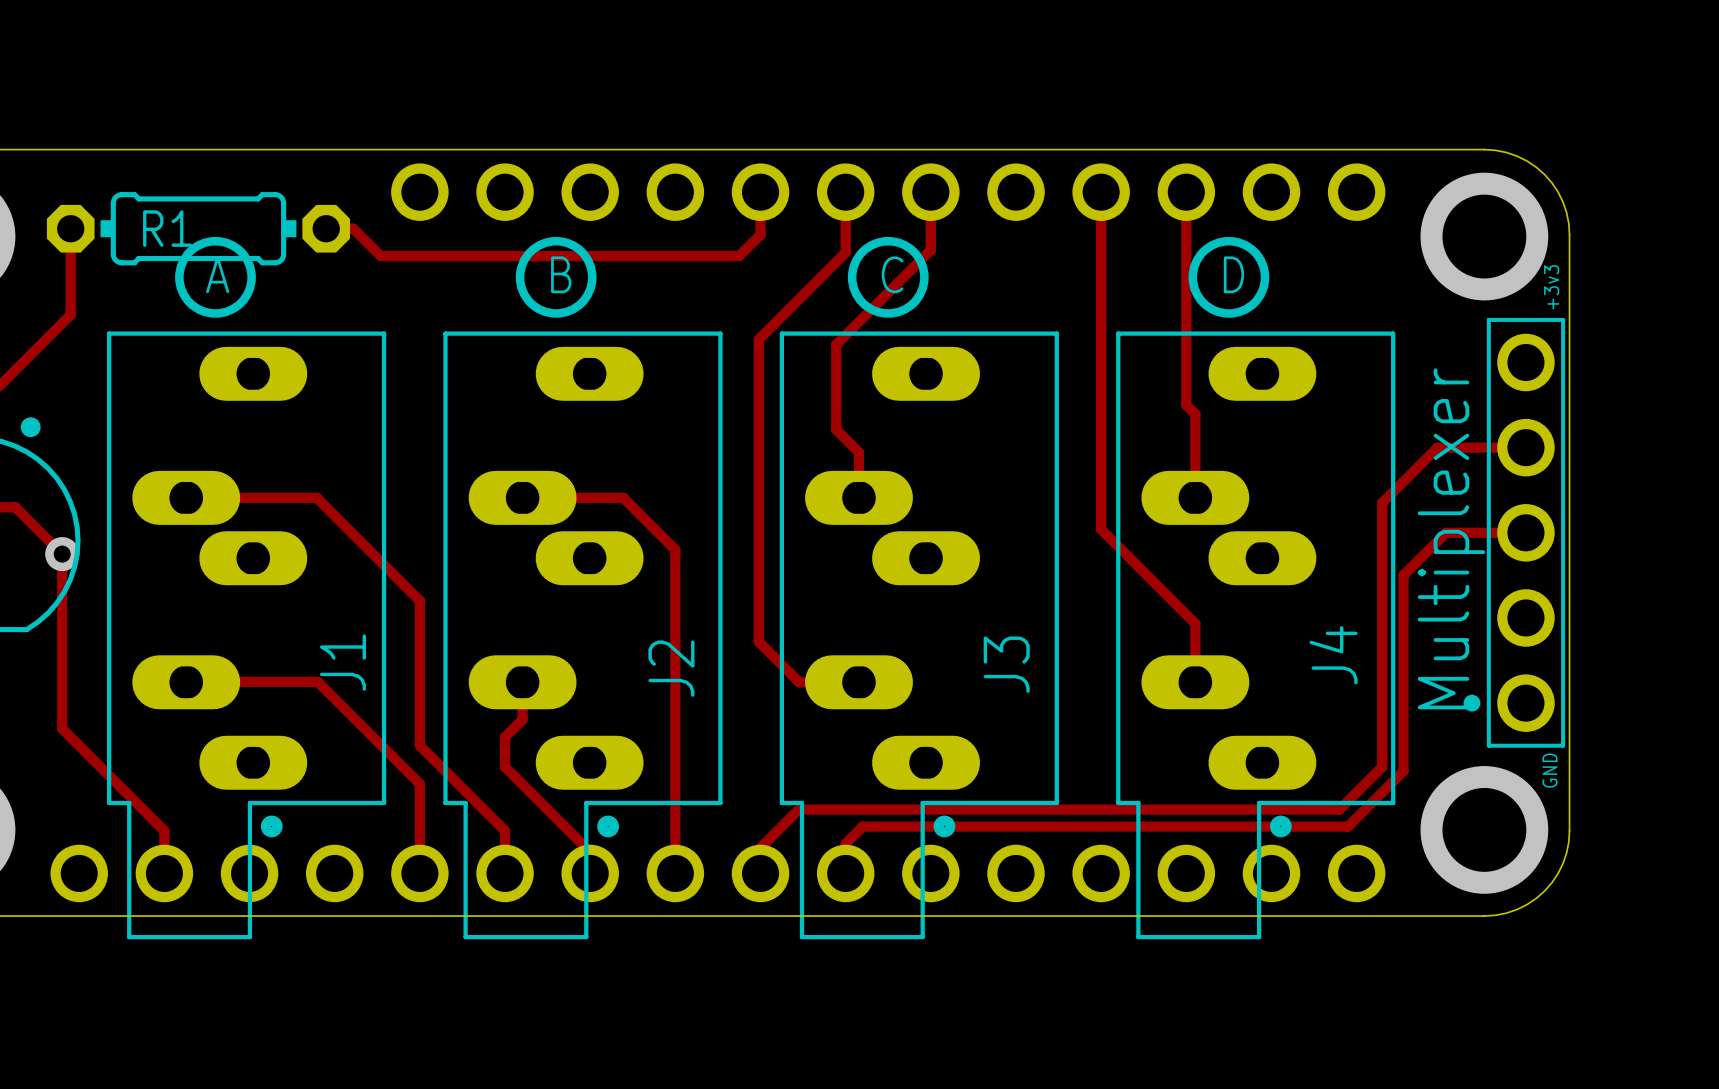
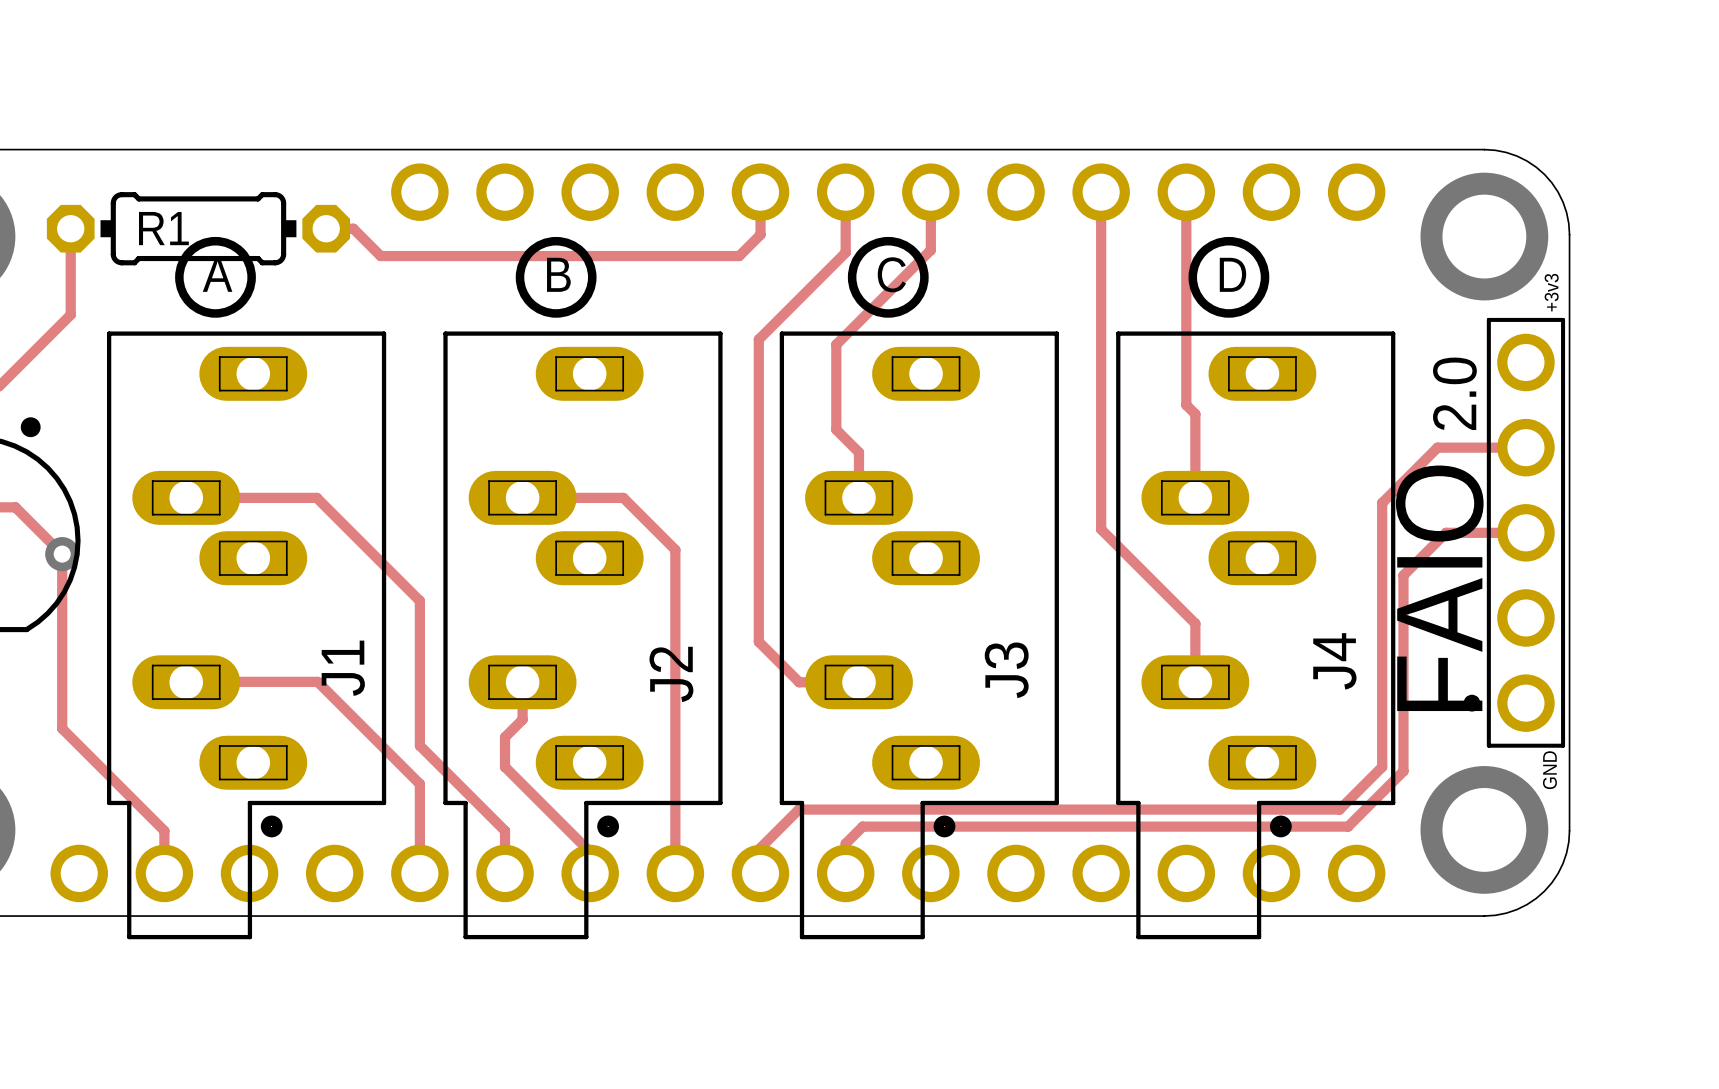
text: none -> 2.0 (1454, 393)
text: Multiplexer (1451, 538) -> FAIO (1439, 588)

